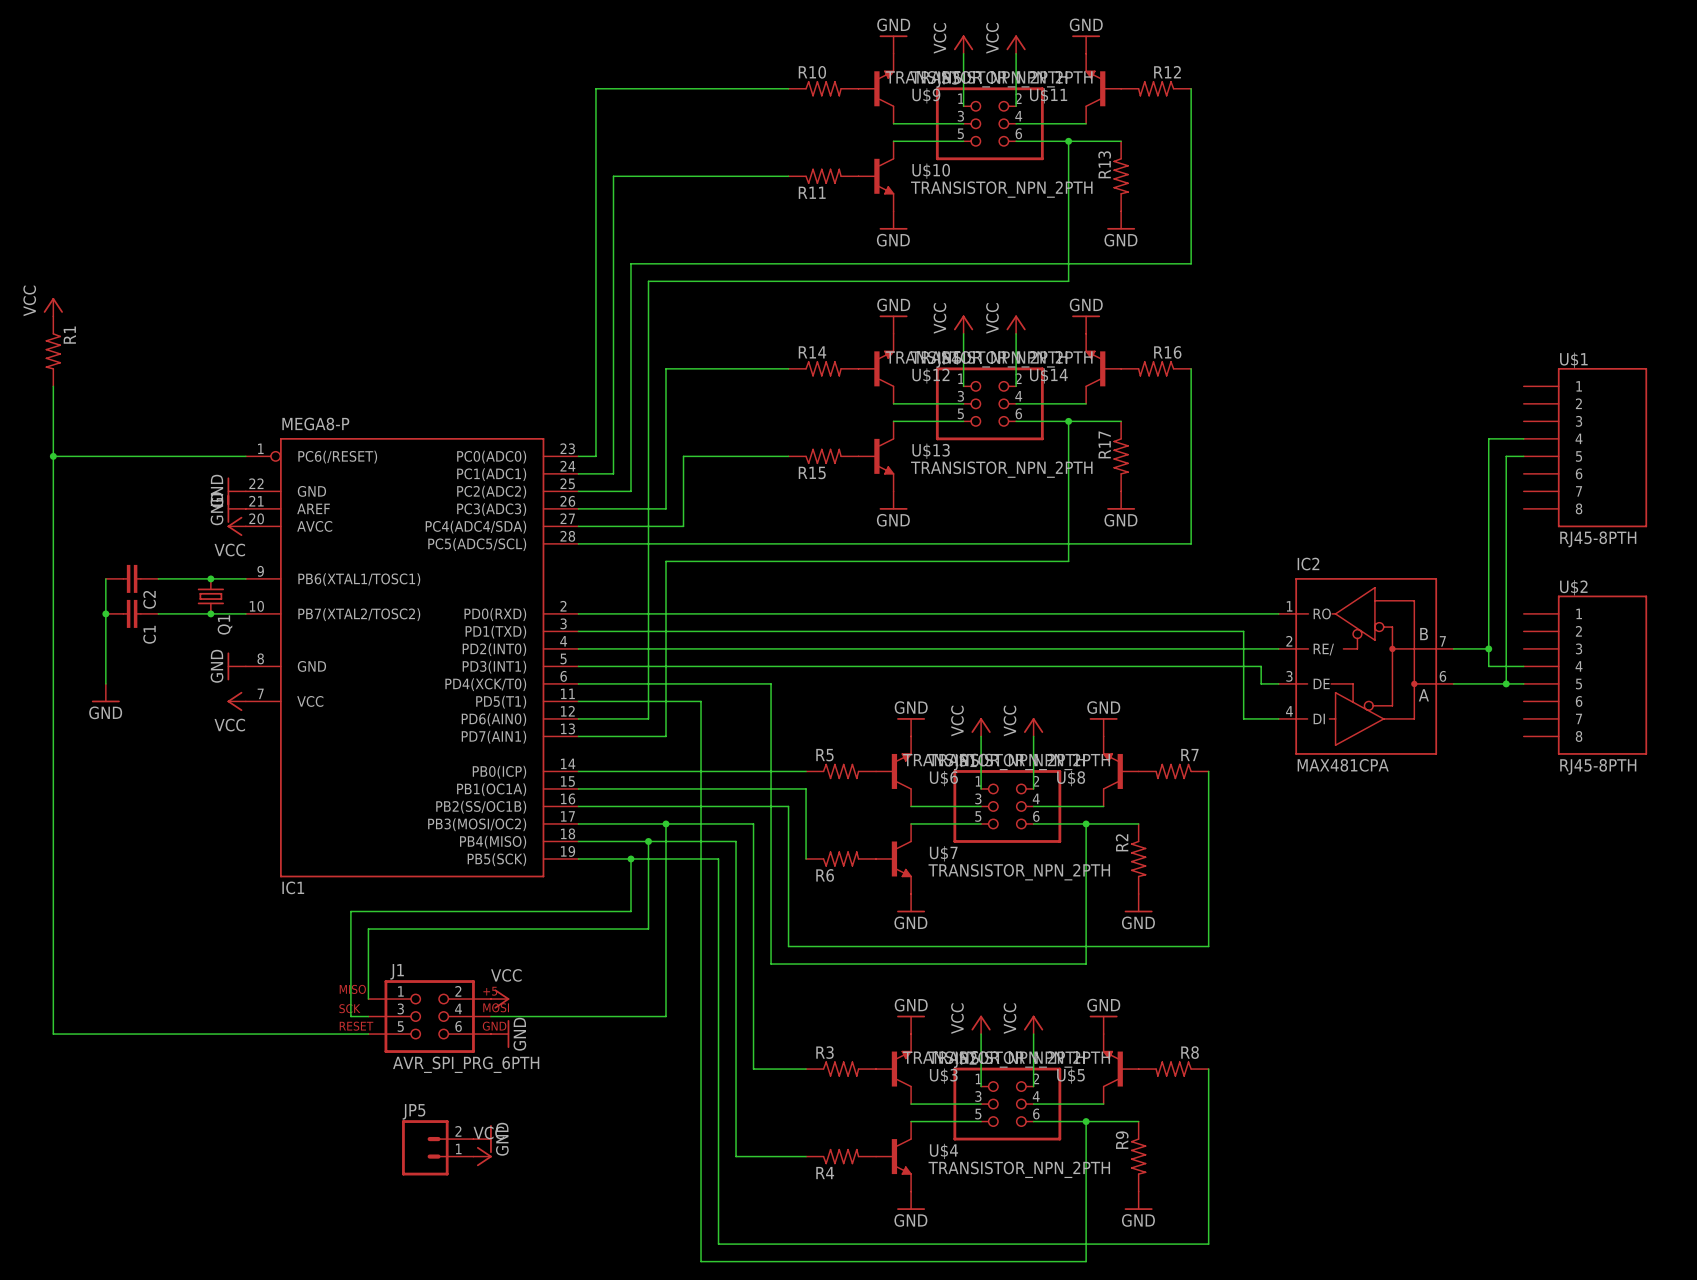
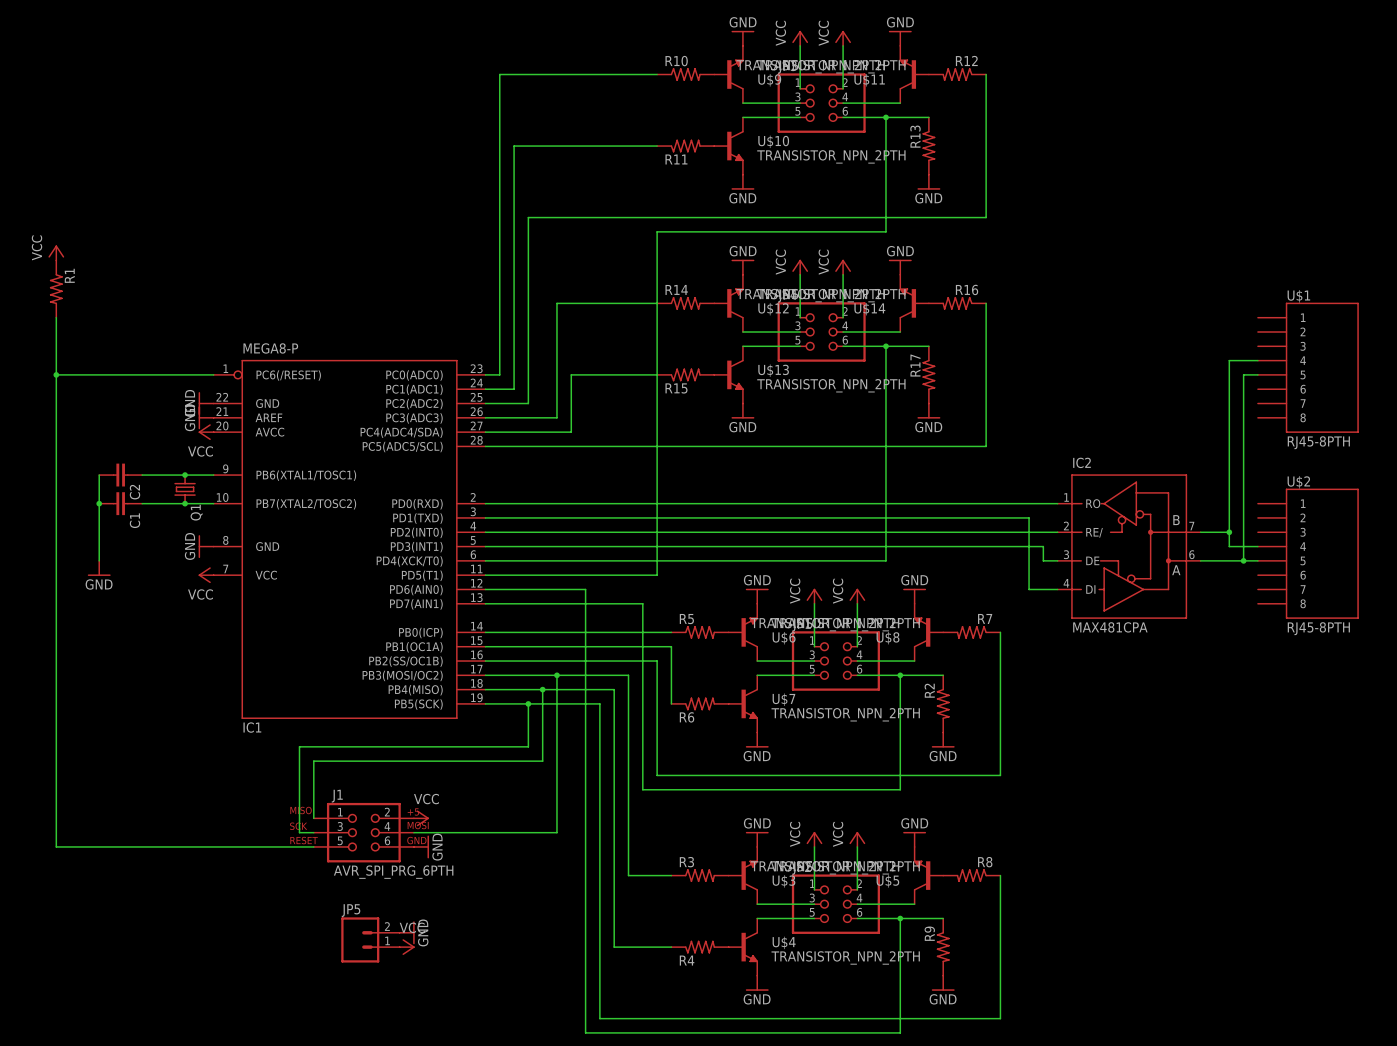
wire: (788, 281) (648, 281) (648, 718) -> (657, 231) (657, 575) (585, 575)
wire: (1068, 561) (666, 561) (666, 736) -> (885, 460) (885, 560) (642, 560)
wire: (771, 683) (771, 736) -> (556, 603) (642, 603)
wire: (701, 701) (701, 718) -> (542, 589) (585, 589)

